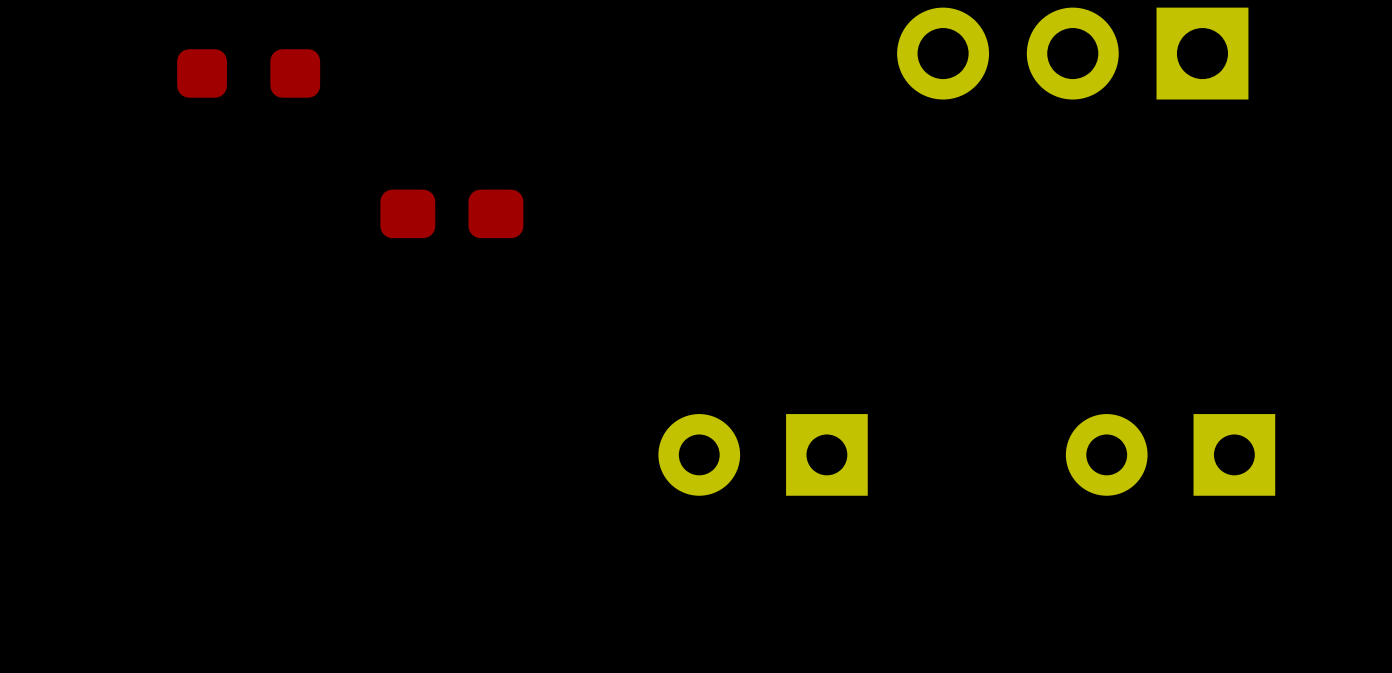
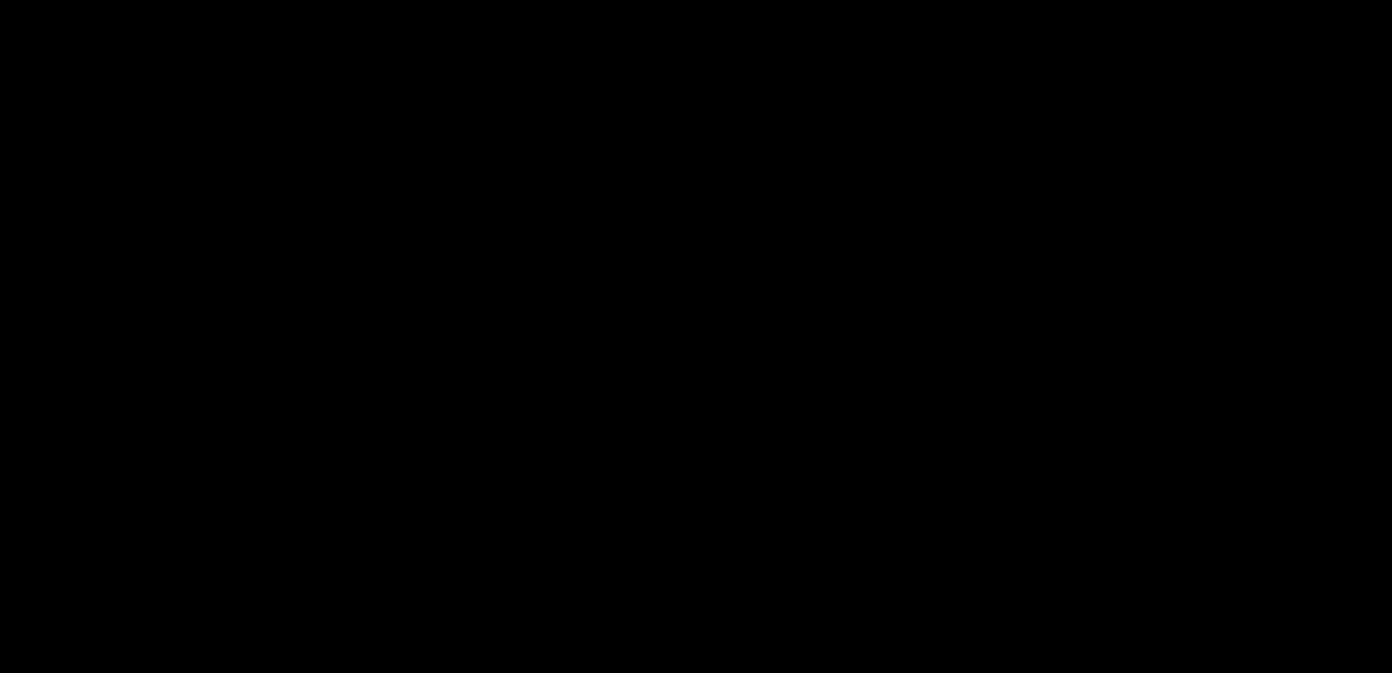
part: (1072, 53) -> none
part: (248, 73) -> none
part: (451, 213) -> none
part: (763, 454) -> none
part: (1170, 454) -> none

